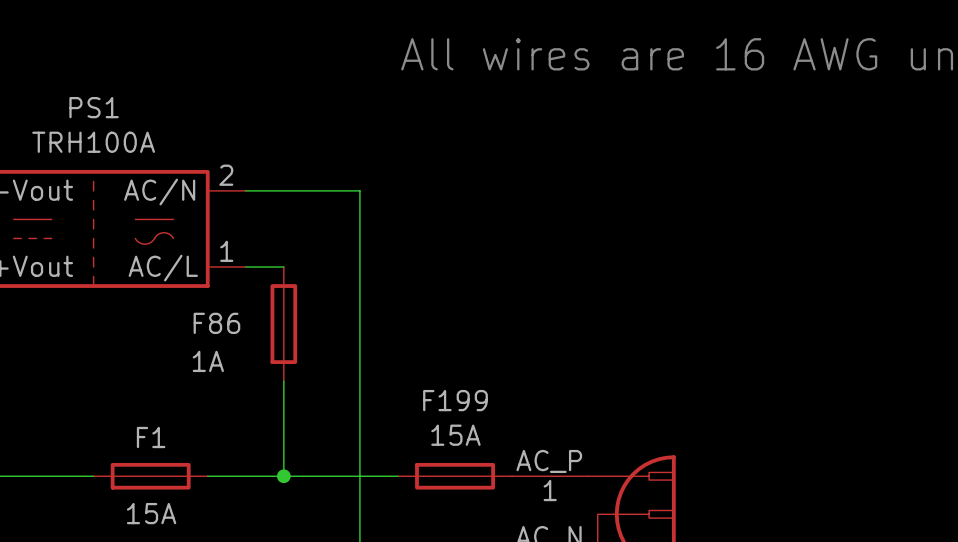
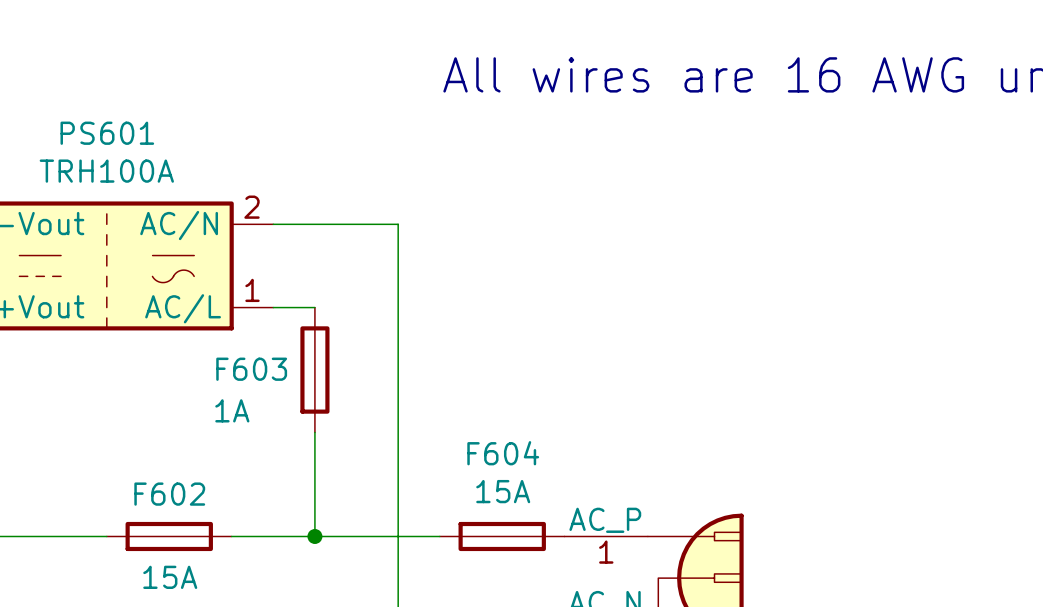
PS1 name: PS1 (94, 107) -> PS601 (107, 133)
F86 name: F86 (216, 323) -> F603 (251, 369)
F199 name: F199 (455, 400) -> F604 (503, 453)
F1 name: F1 (151, 437) -> F602 (169, 494)

